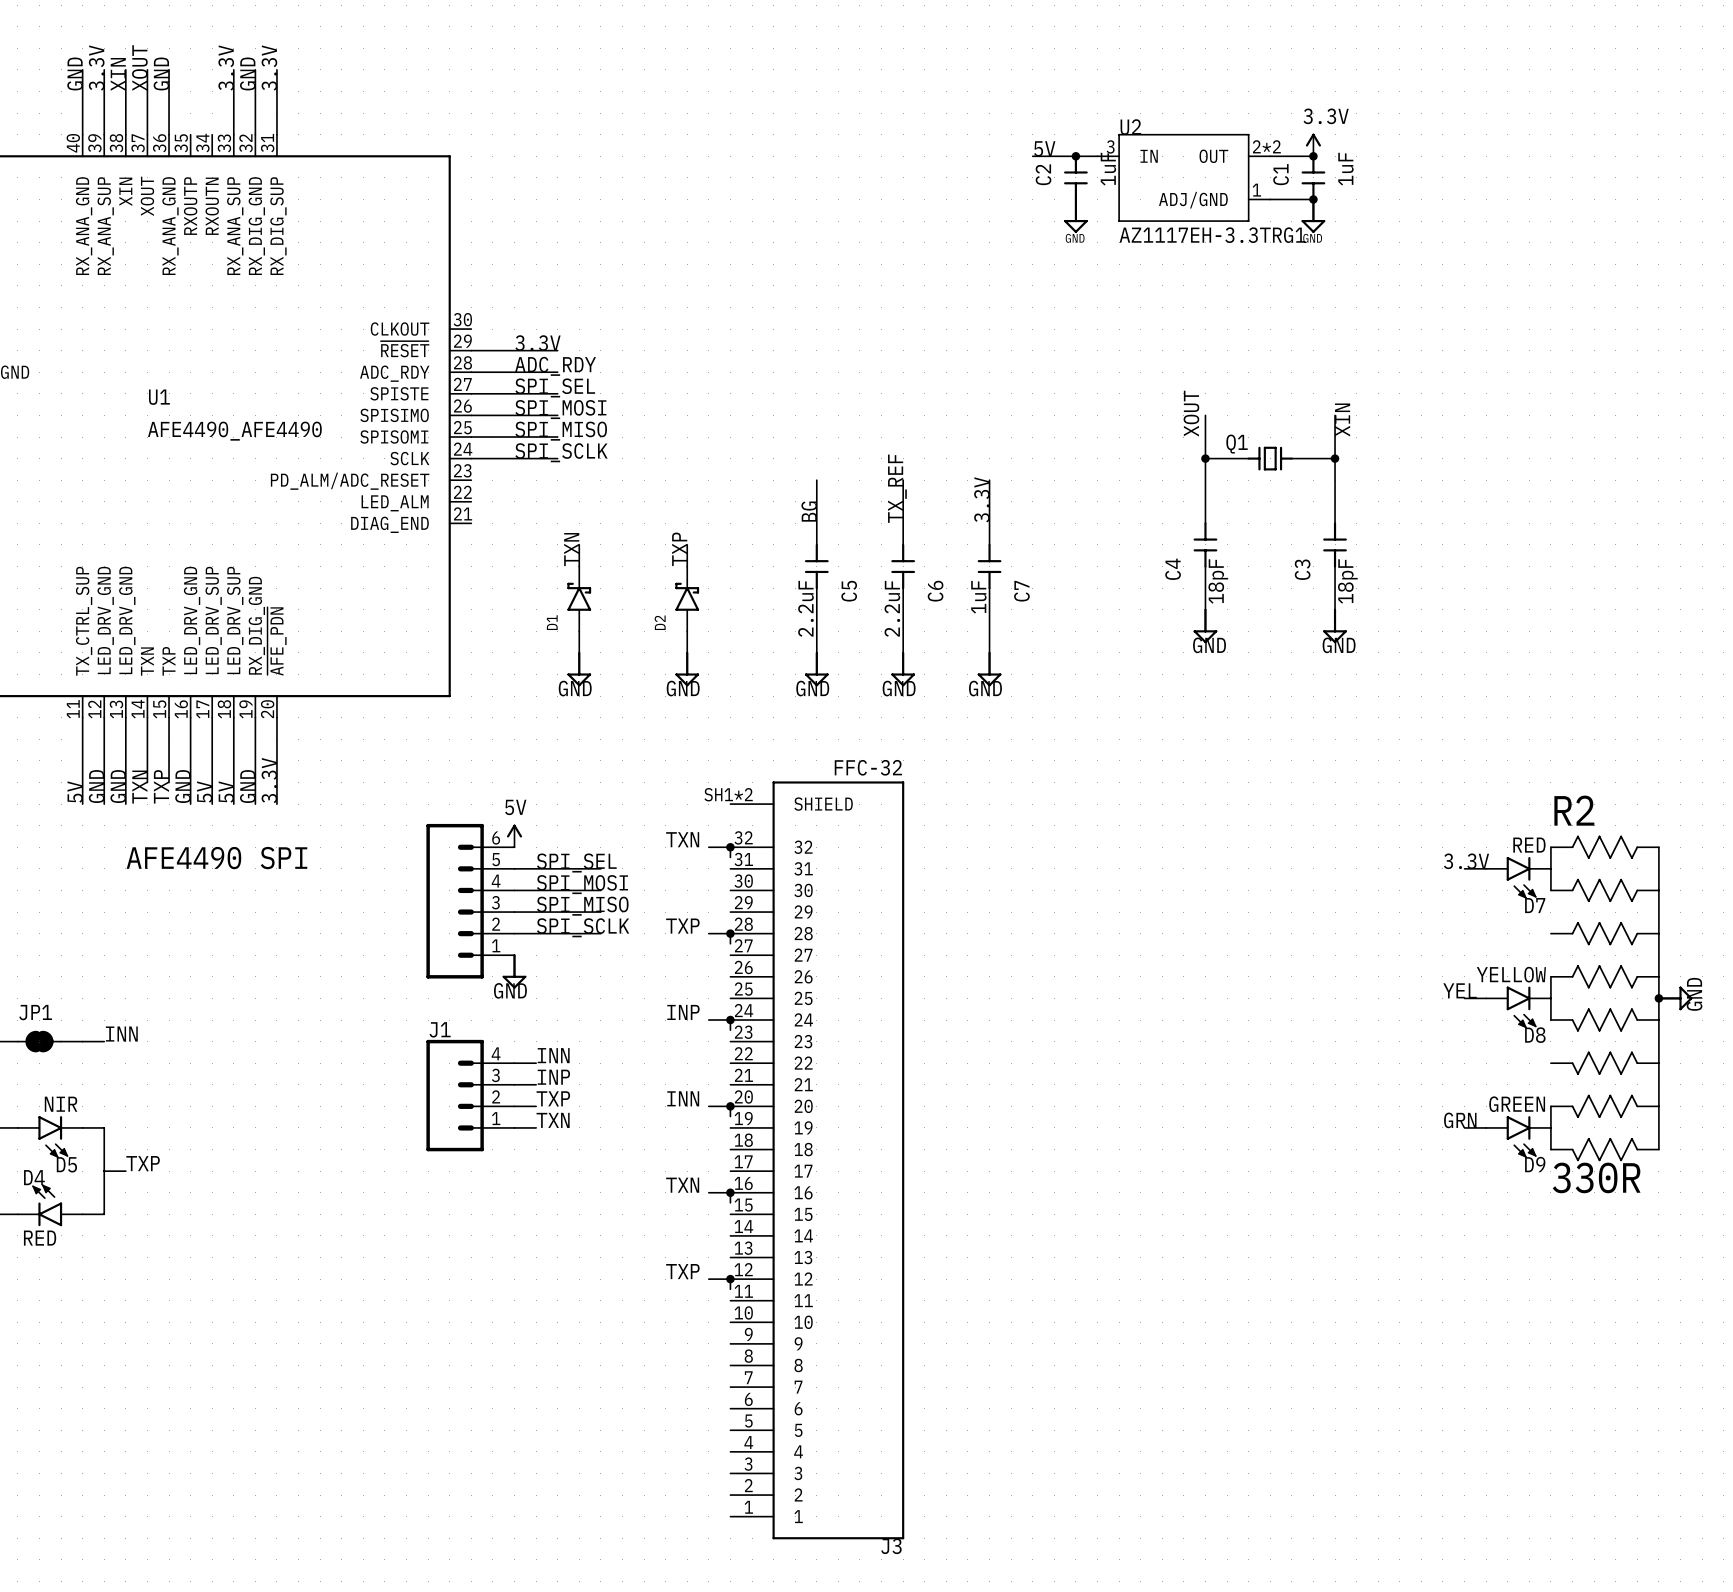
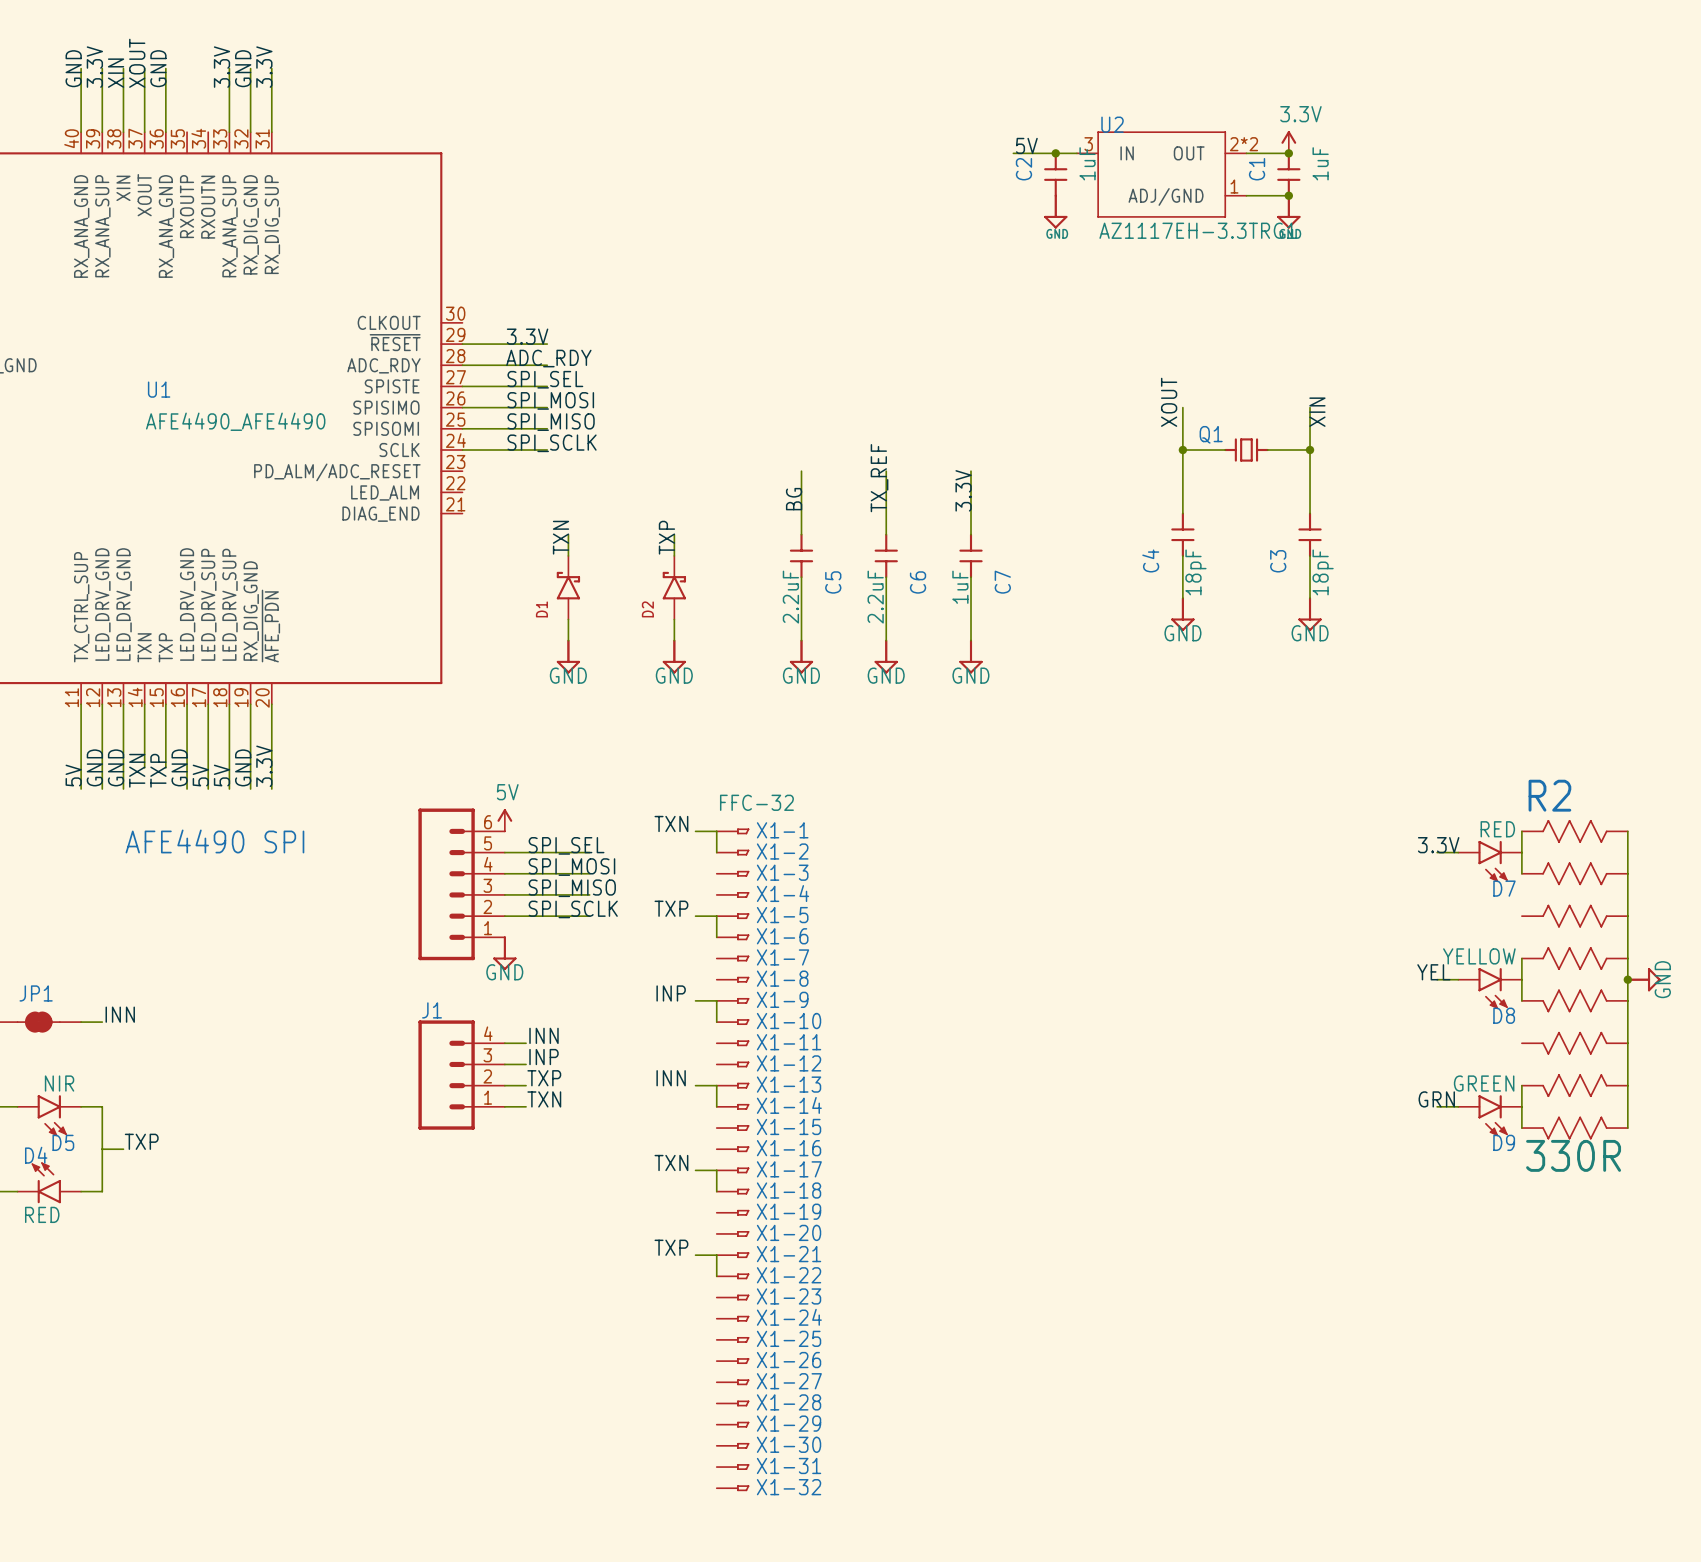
junction: (730, 847) -> none
X1-1: none -> FFC-32 (732, 831)
wire: none -> (716, 841) (716, 852)
X1-2: none -> (732, 852)
X1-3: none -> (732, 873)
X1-4: none -> (732, 894)
junction: (730, 933) -> none
X1-5: none -> (732, 916)
wire: none -> (716, 926) (716, 937)
X1-6: none -> (732, 937)
X1-7: none -> (732, 958)
X1-8: none -> (732, 979)
junction: (730, 1020) -> none
X1-9: none -> (732, 1000)
wire: none -> (716, 1010) (716, 1022)
X1-10: none -> (732, 1022)
X1-11: none -> (732, 1043)
X1-12: none -> (732, 1064)
junction: (730, 1106) -> none
X1-13: none -> (732, 1085)
wire: none -> (716, 1095) (716, 1106)
X1-14: none -> (732, 1106)
X1-15: none -> (732, 1128)
J3: FFC-32 (817, 1160) -> none
X1-16: none -> (732, 1149)
junction: (730, 1192) -> none
X1-17: none -> (732, 1170)
wire: none -> (716, 1180) (716, 1191)
X1-18: none -> (732, 1191)
X1-19: none -> (732, 1212)
X1-20: none -> (732, 1233)
junction: (730, 1279) -> none
X1-21: none -> (732, 1255)
wire: none -> (716, 1265) (716, 1276)
X1-22: none -> (732, 1276)
X1-23: none -> (732, 1297)
X1-24: none -> (732, 1318)
X1-25: none -> (732, 1339)
X1-26: none -> (732, 1361)
X1-27: none -> (732, 1382)
X1-28: none -> (732, 1403)
X1-29: none -> (732, 1424)
X1-30: none -> (732, 1445)
X1-31: none -> (732, 1467)
X1-32: none -> (732, 1488)

